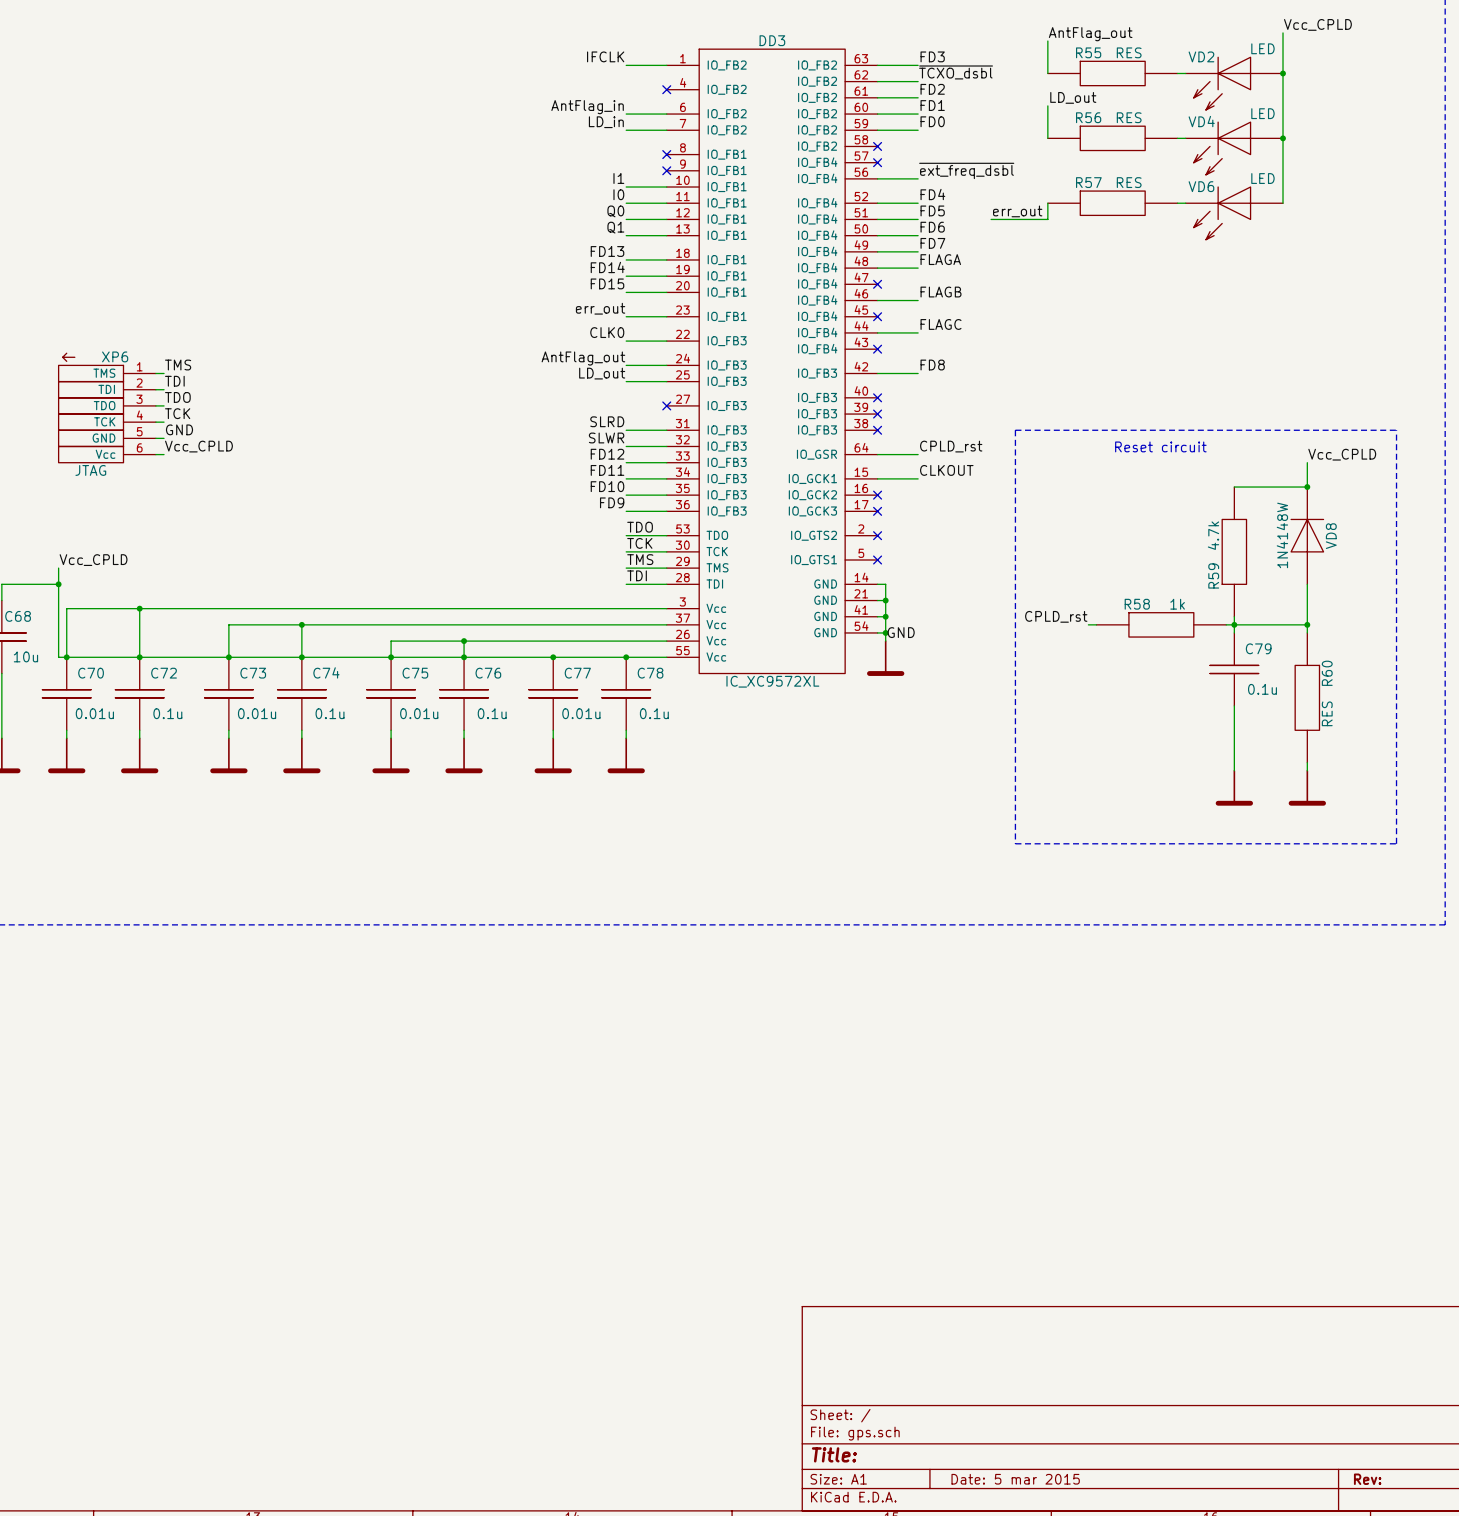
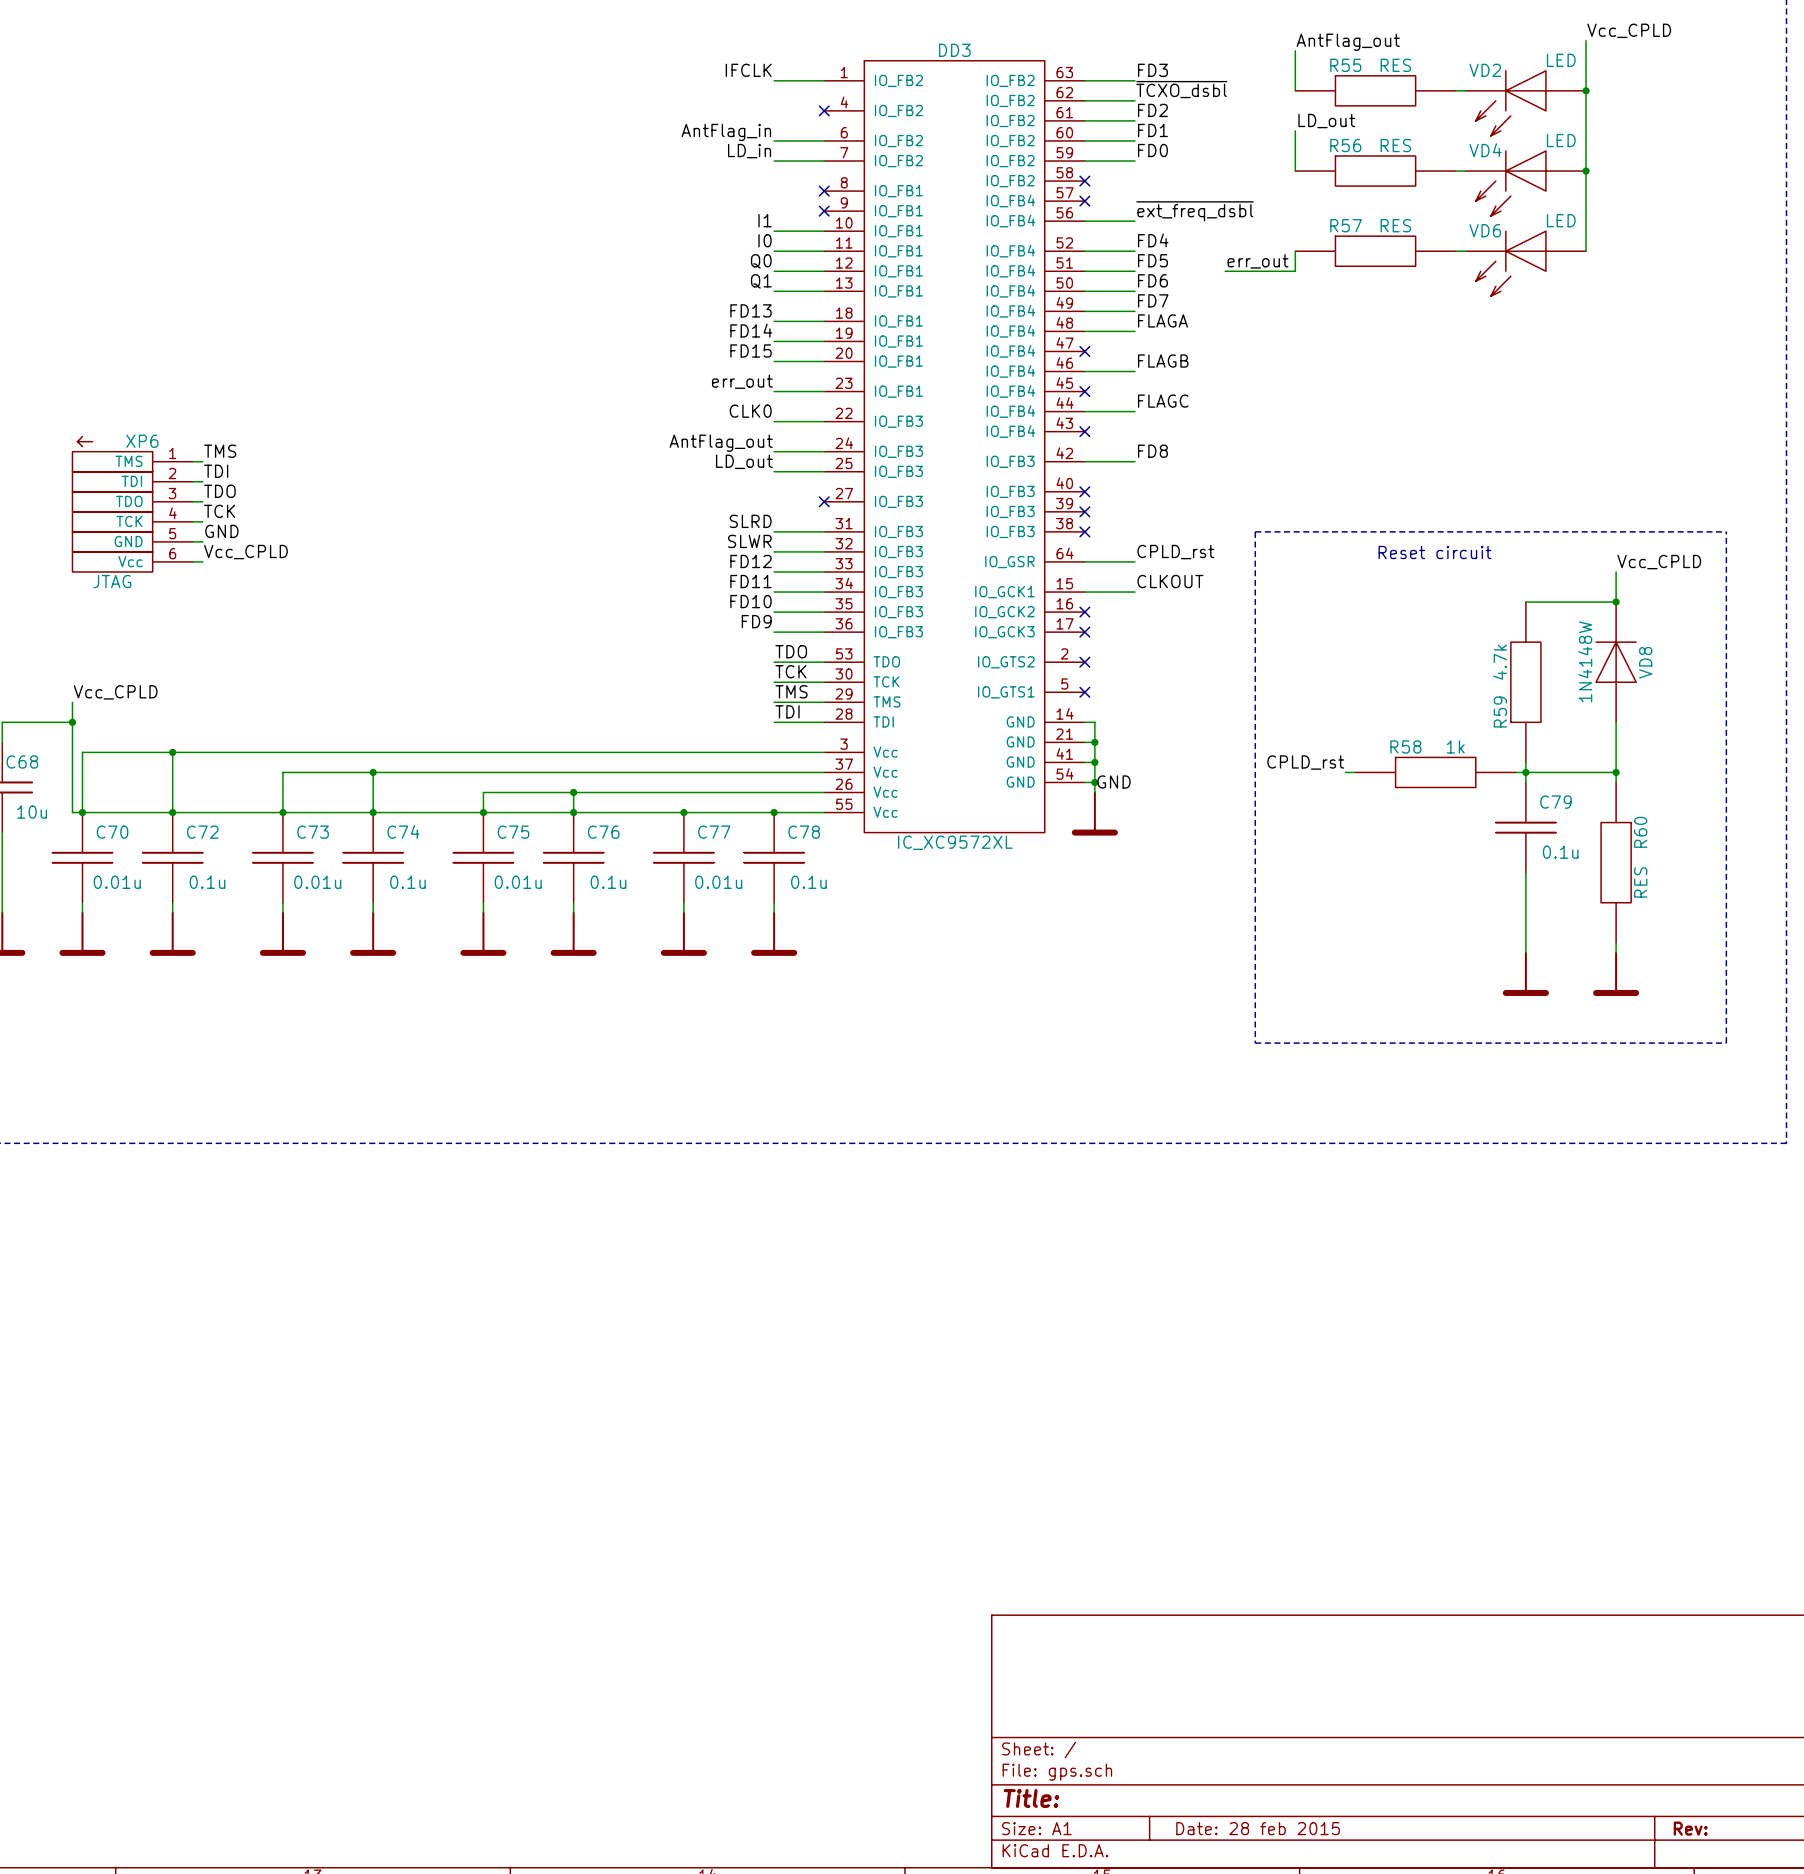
title block: Date: 5 mar 2015 (1015, 1479) -> Date: 28 feb 2015 (1258, 1828)

